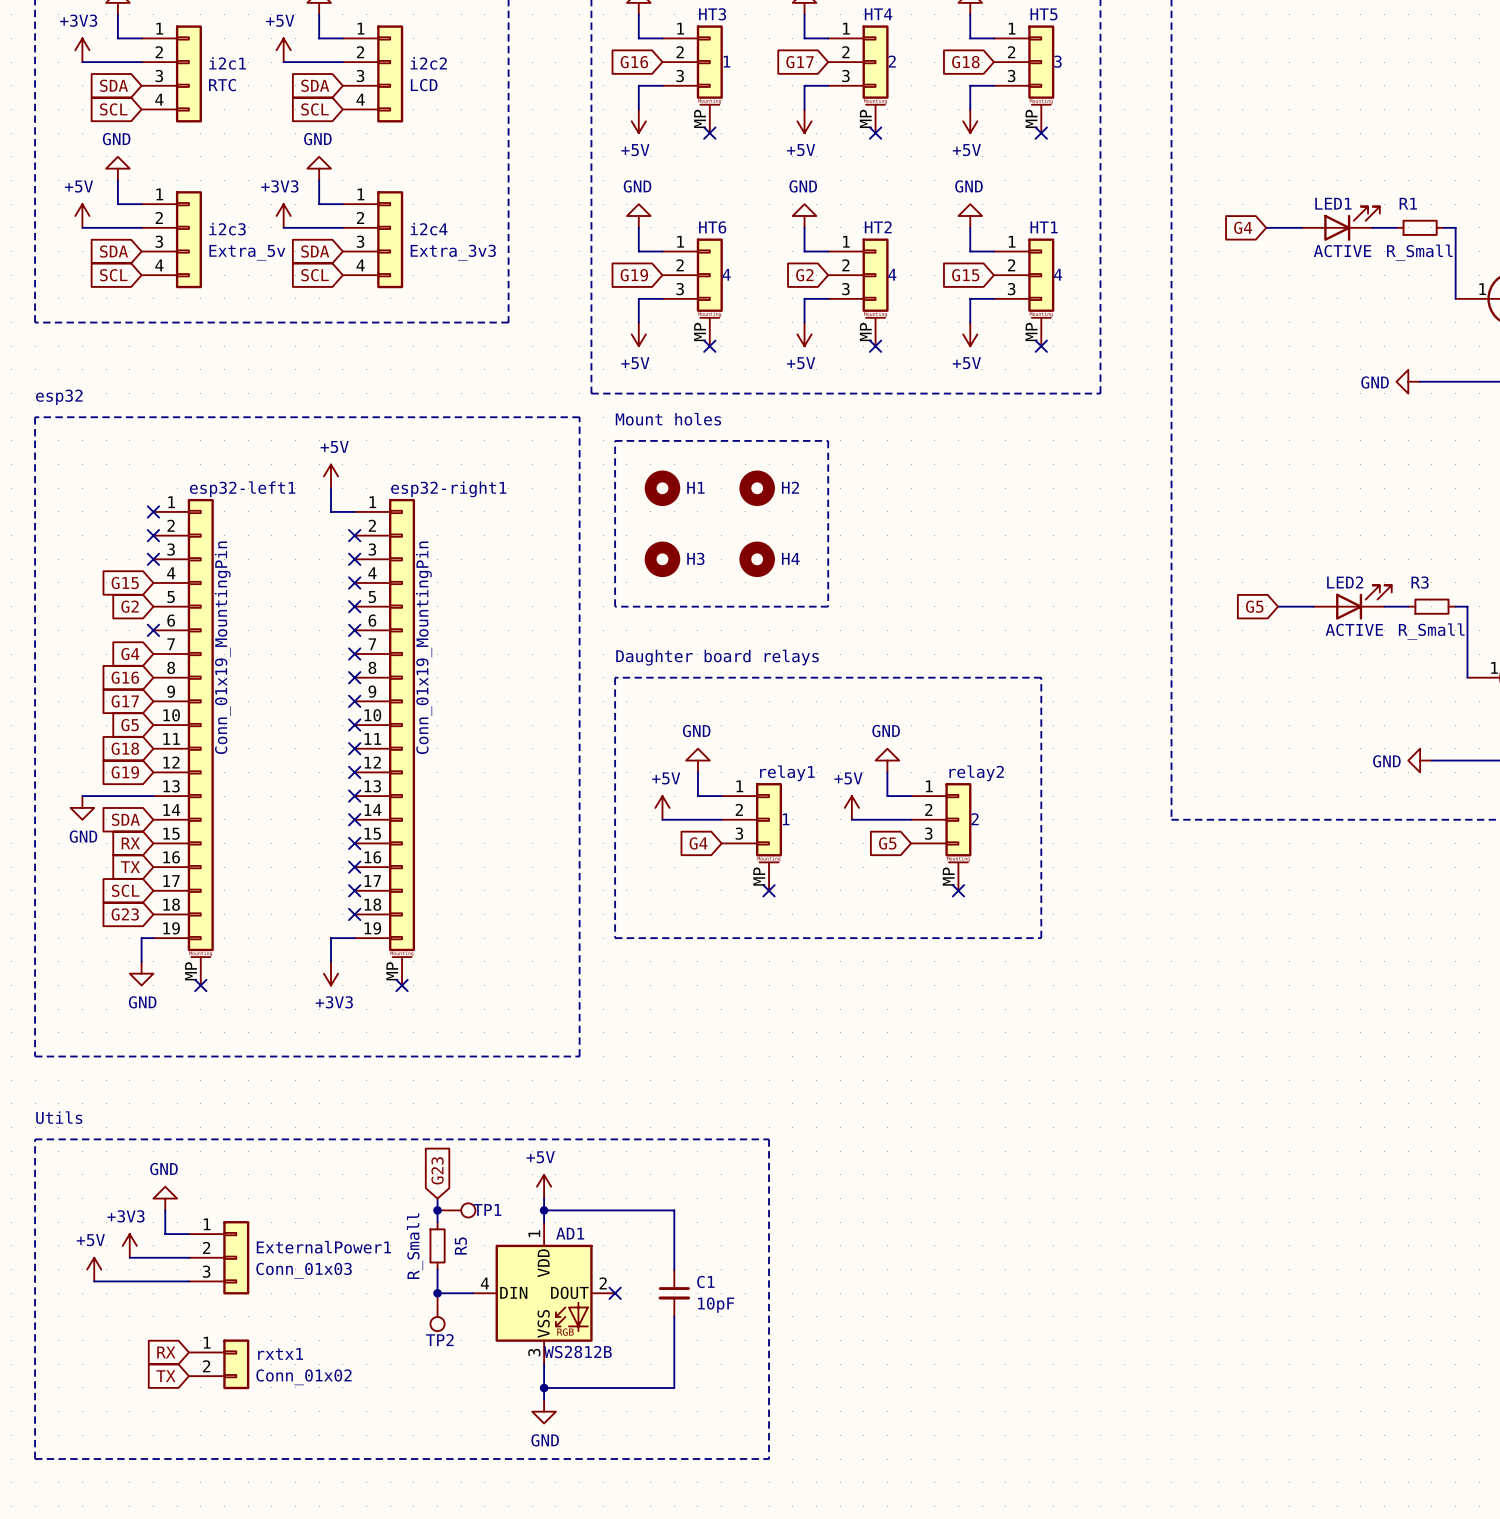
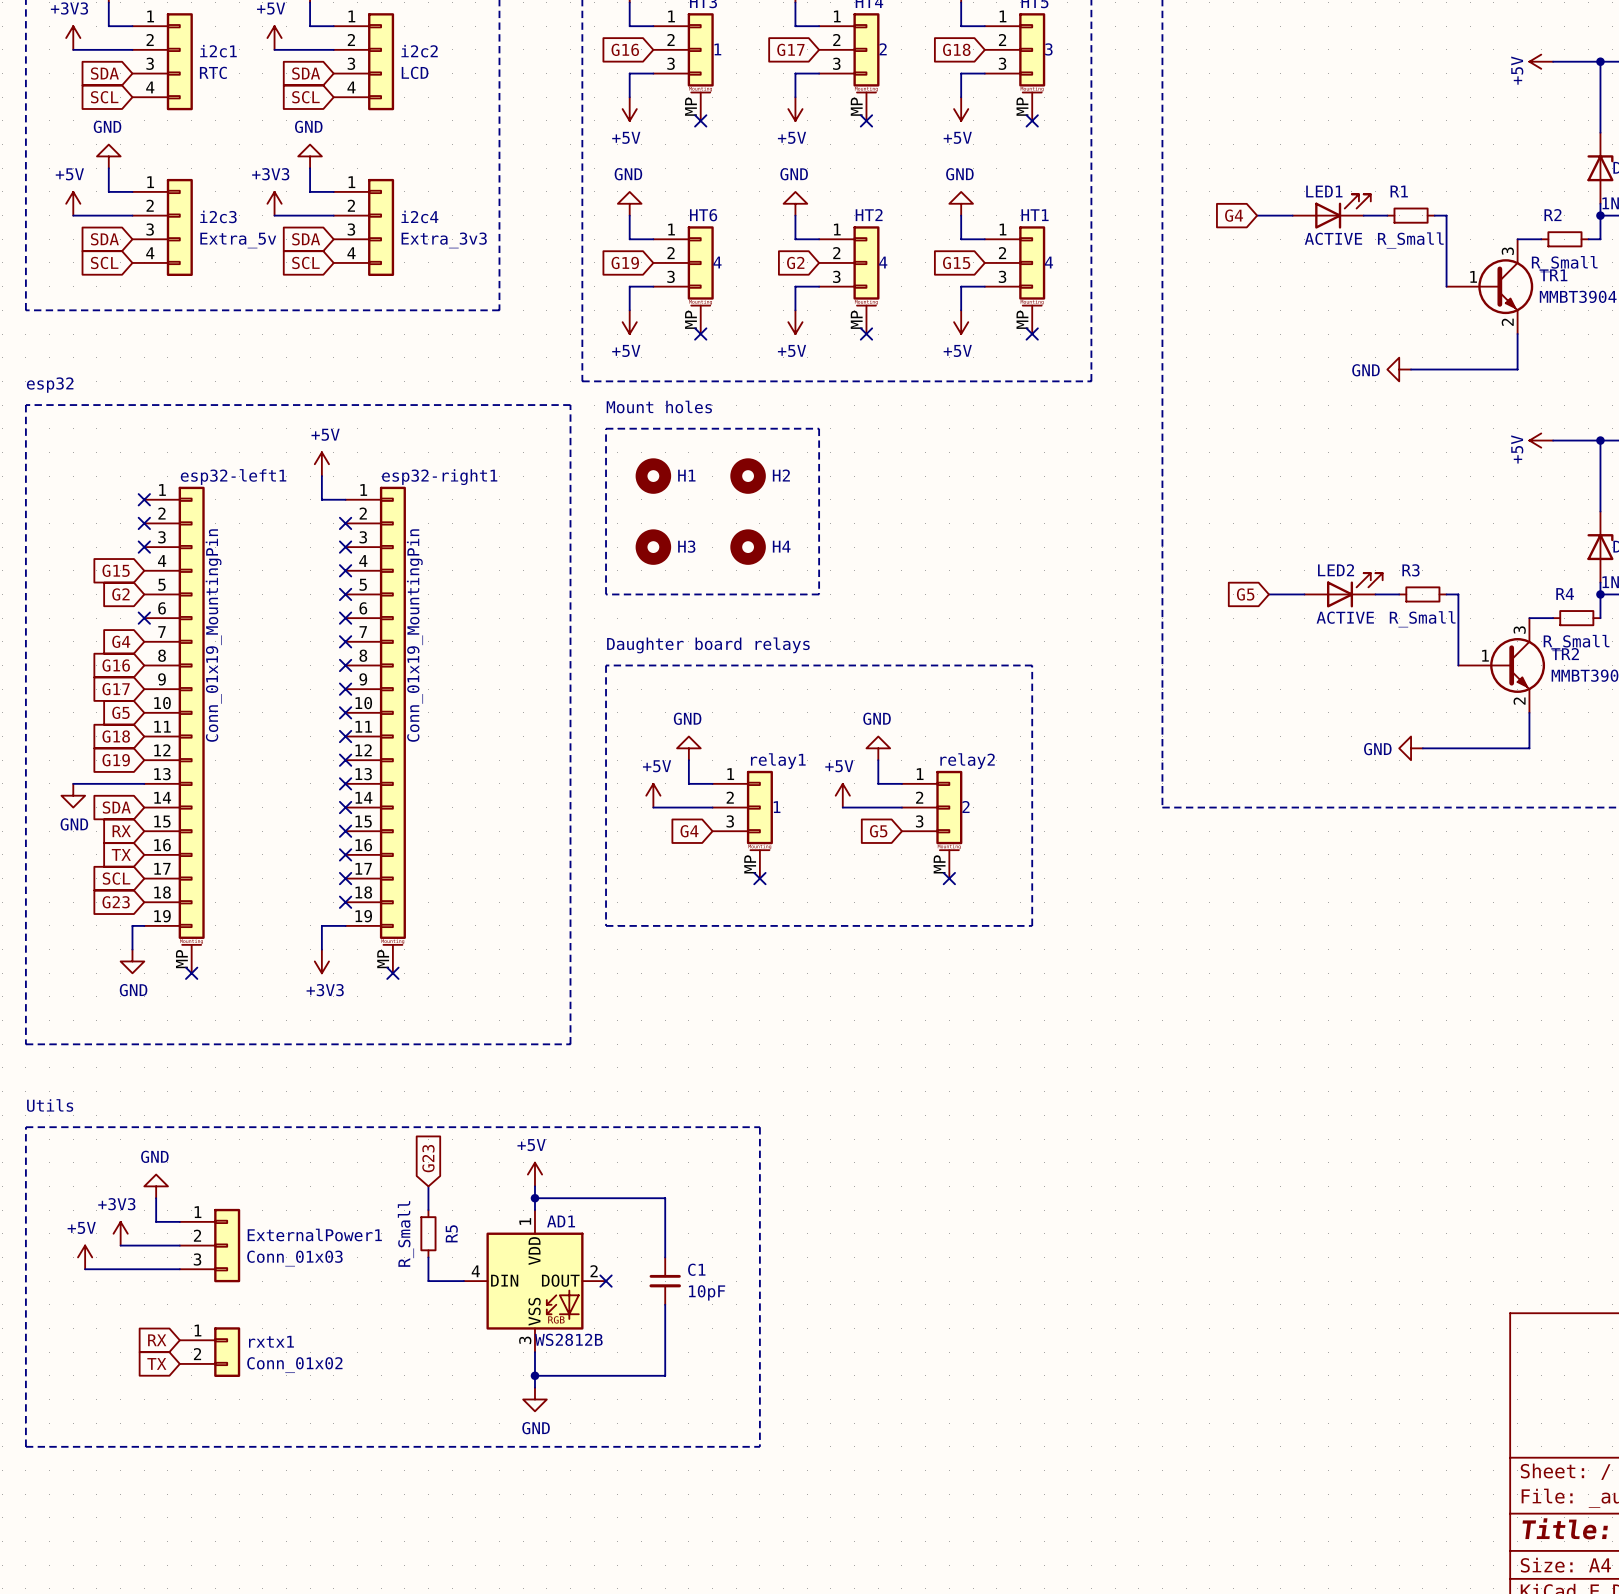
junction: (437, 1210) -> none
TP1: (456, 1210) -> none
junction: (437, 1293) -> none
TP2: (437, 1312) -> none

